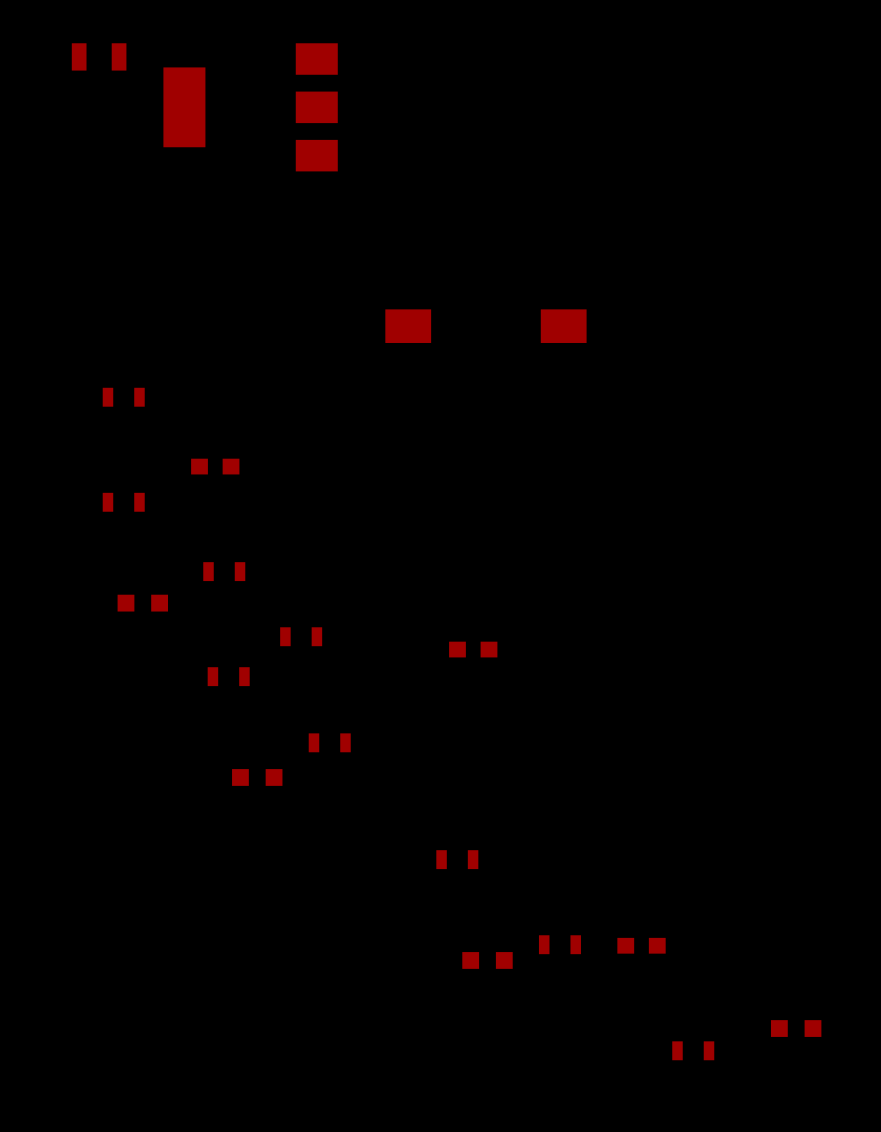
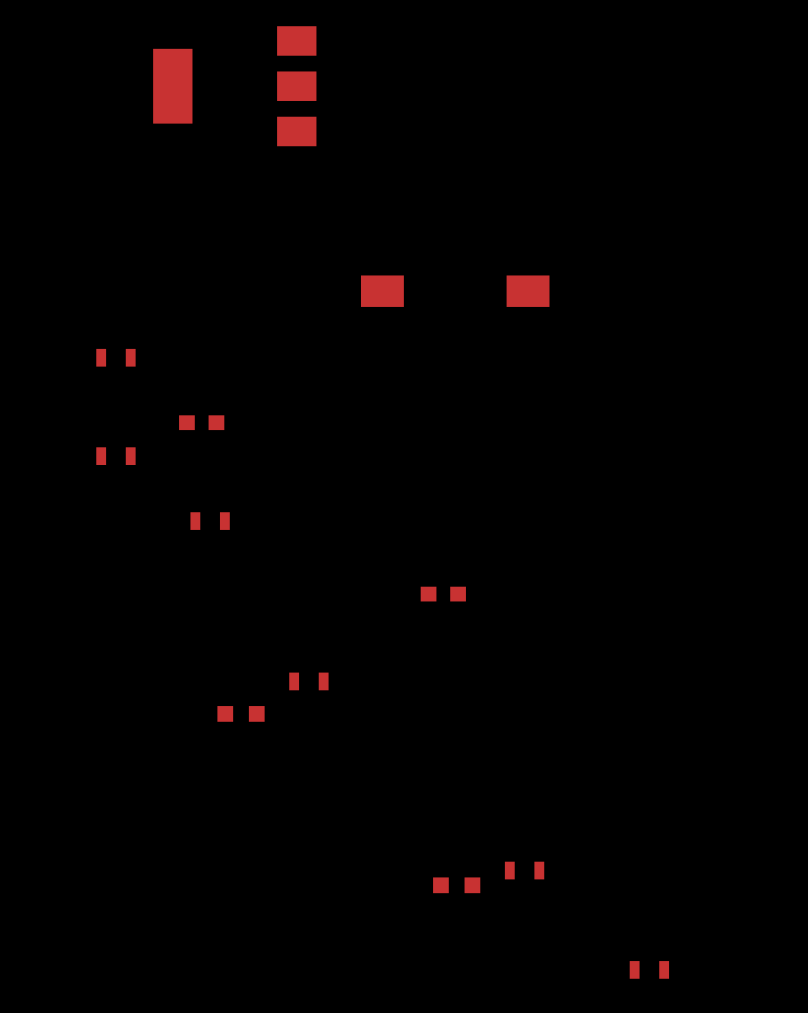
part: (99, 56) -> none
part: (142, 603) -> none
part: (301, 636) -> none
part: (228, 676) -> none
part: (457, 859) -> none
part: (641, 945) -> none
part: (796, 1028) -> none

